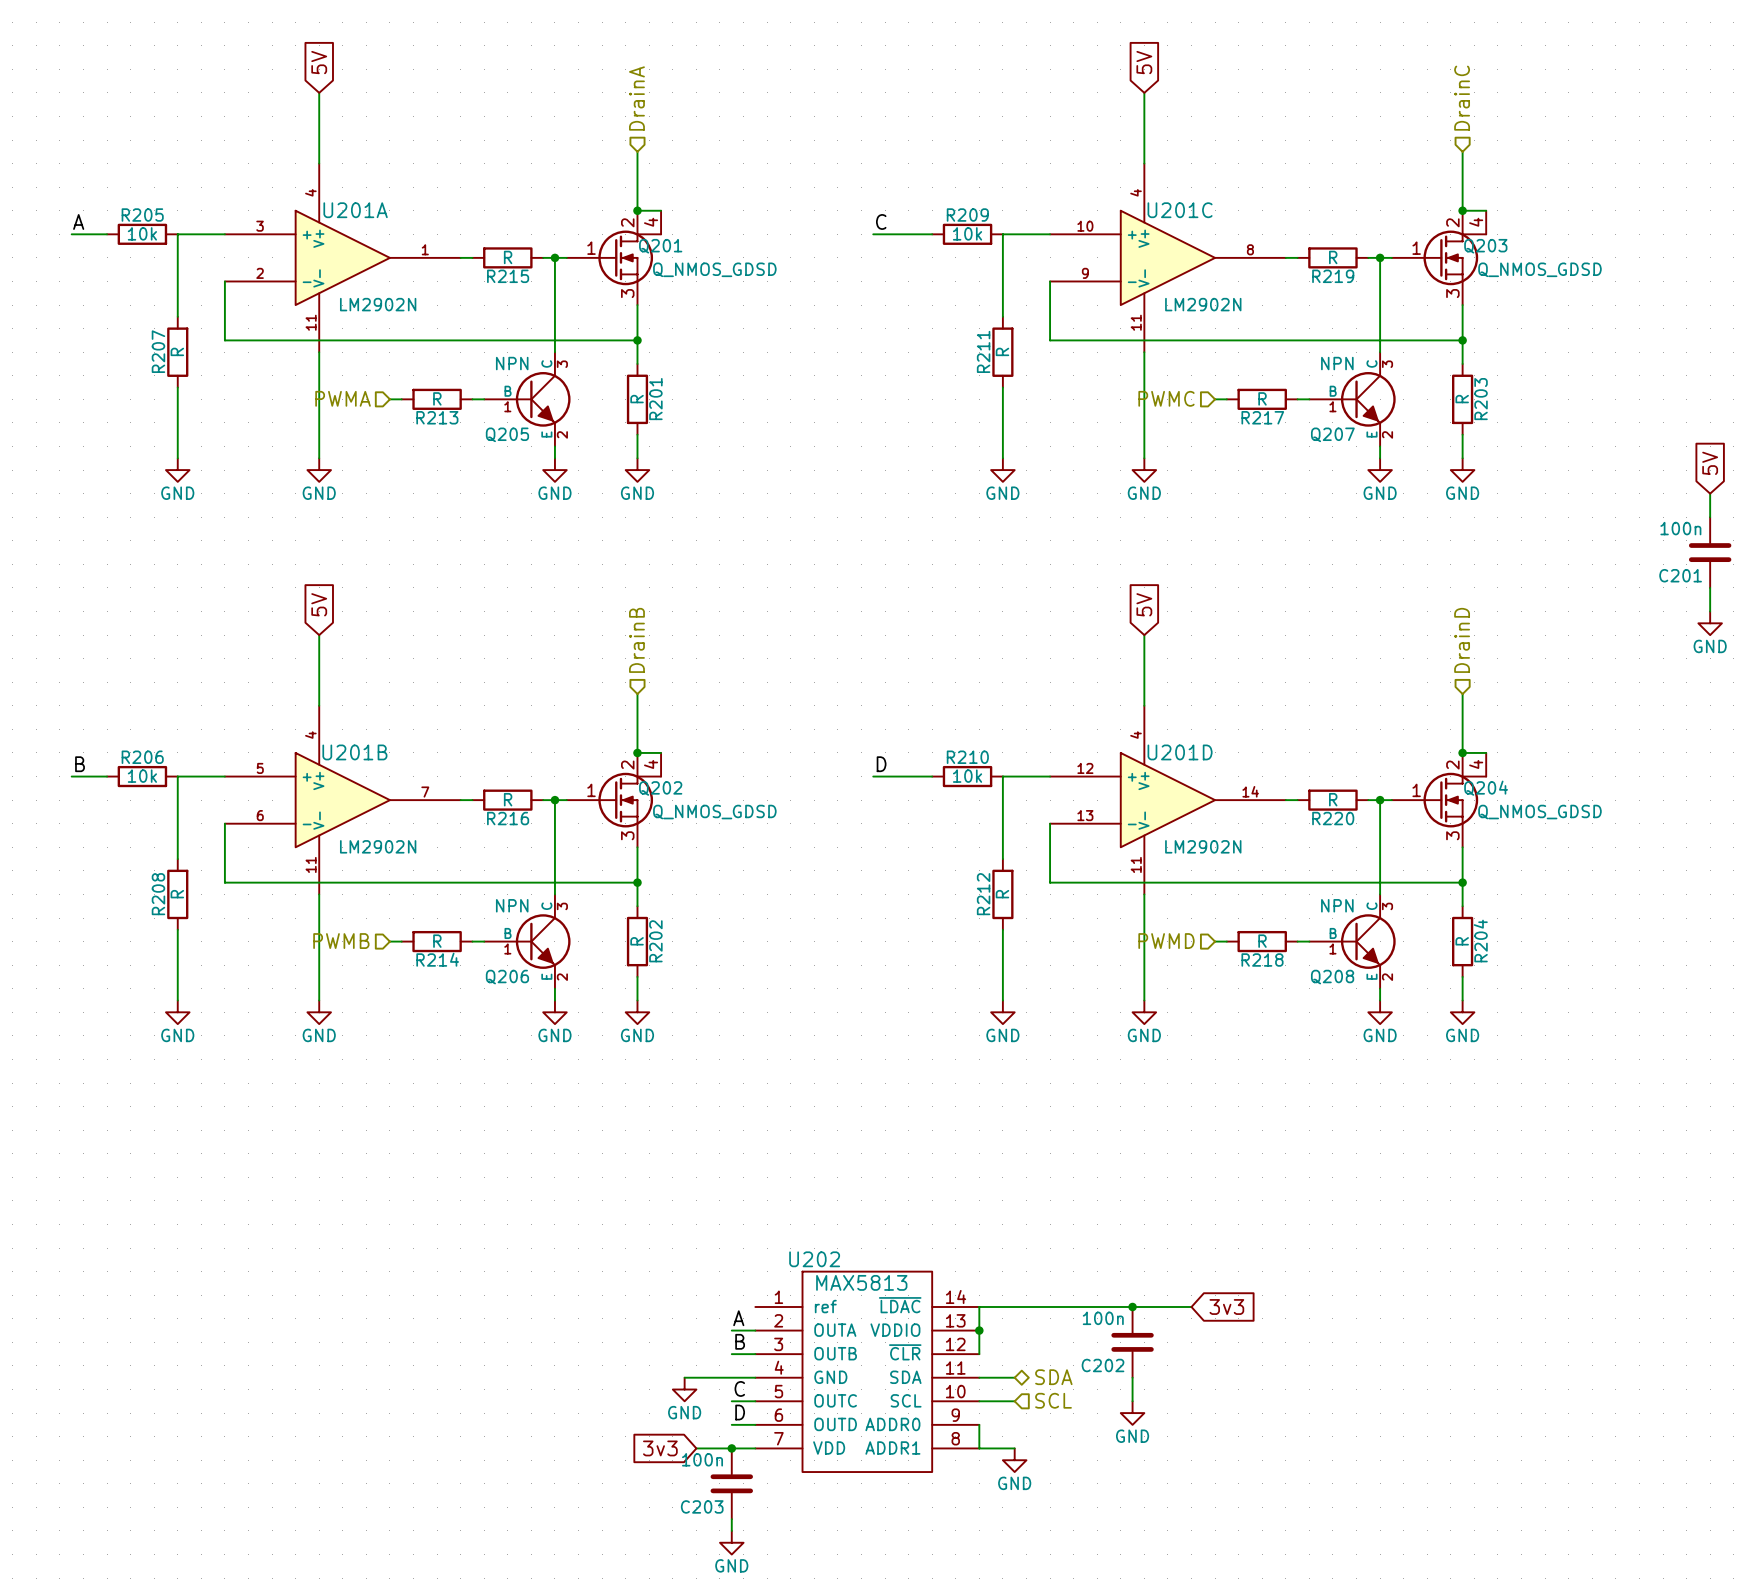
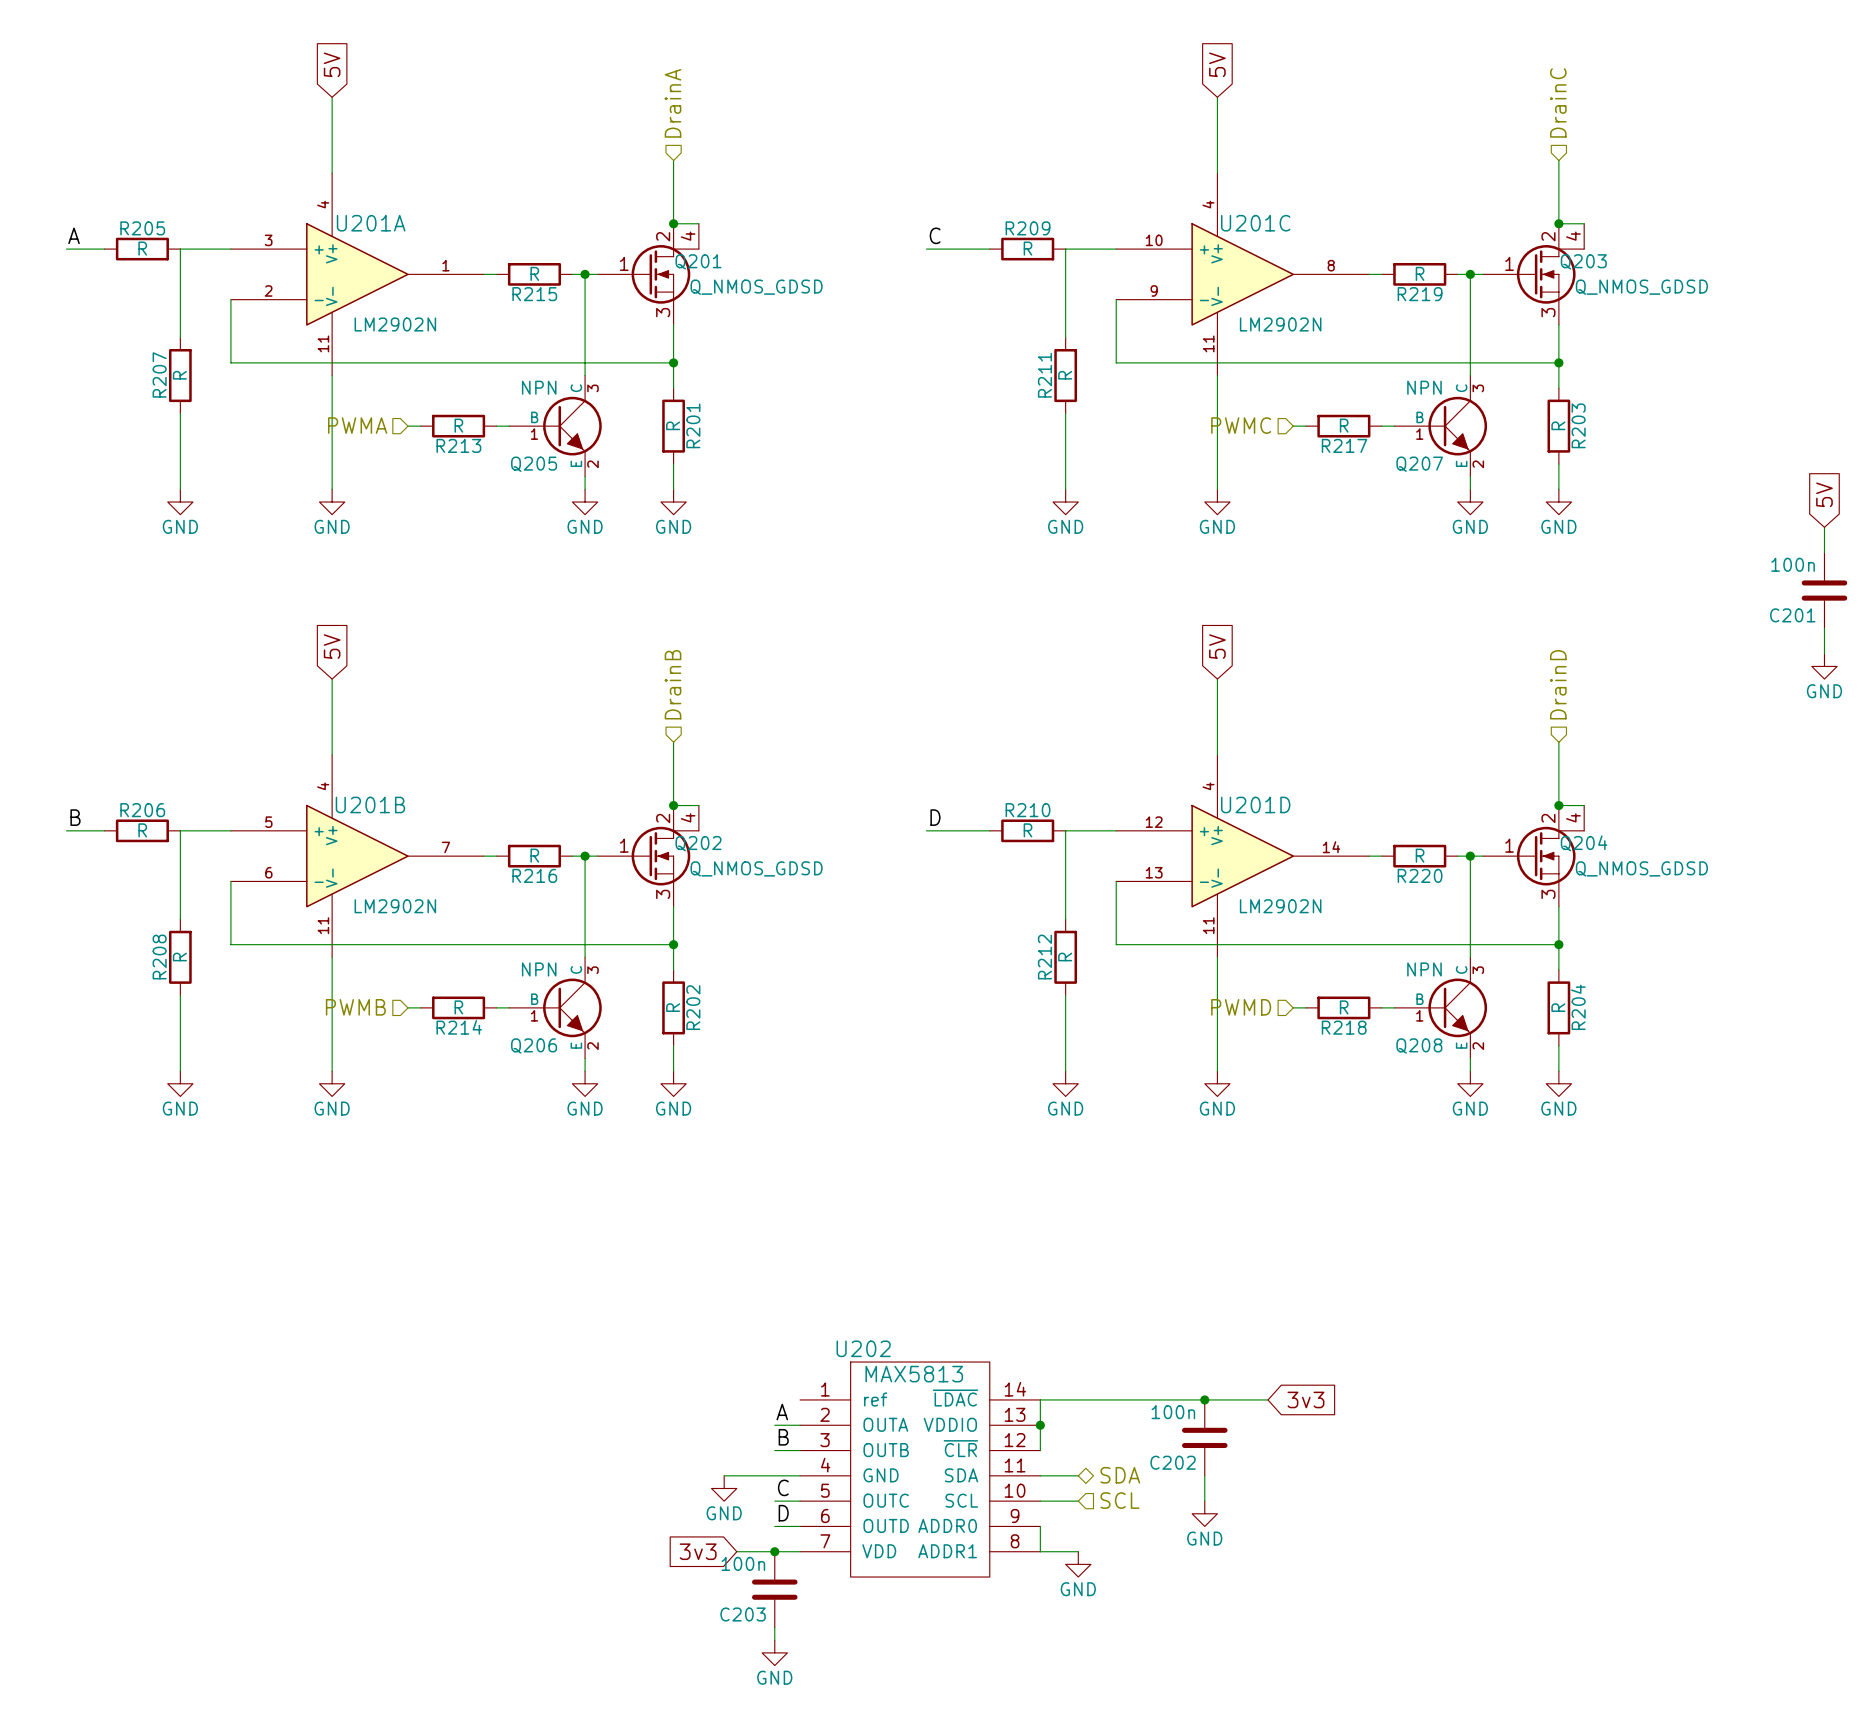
R205 value: 10k (142, 233) -> R (142, 248)
R209 value: 10k (967, 233) -> R (1028, 248)
R206 value: 10k (142, 776) -> R (142, 830)
R210 value: 10k (967, 776) -> R (1028, 830)

